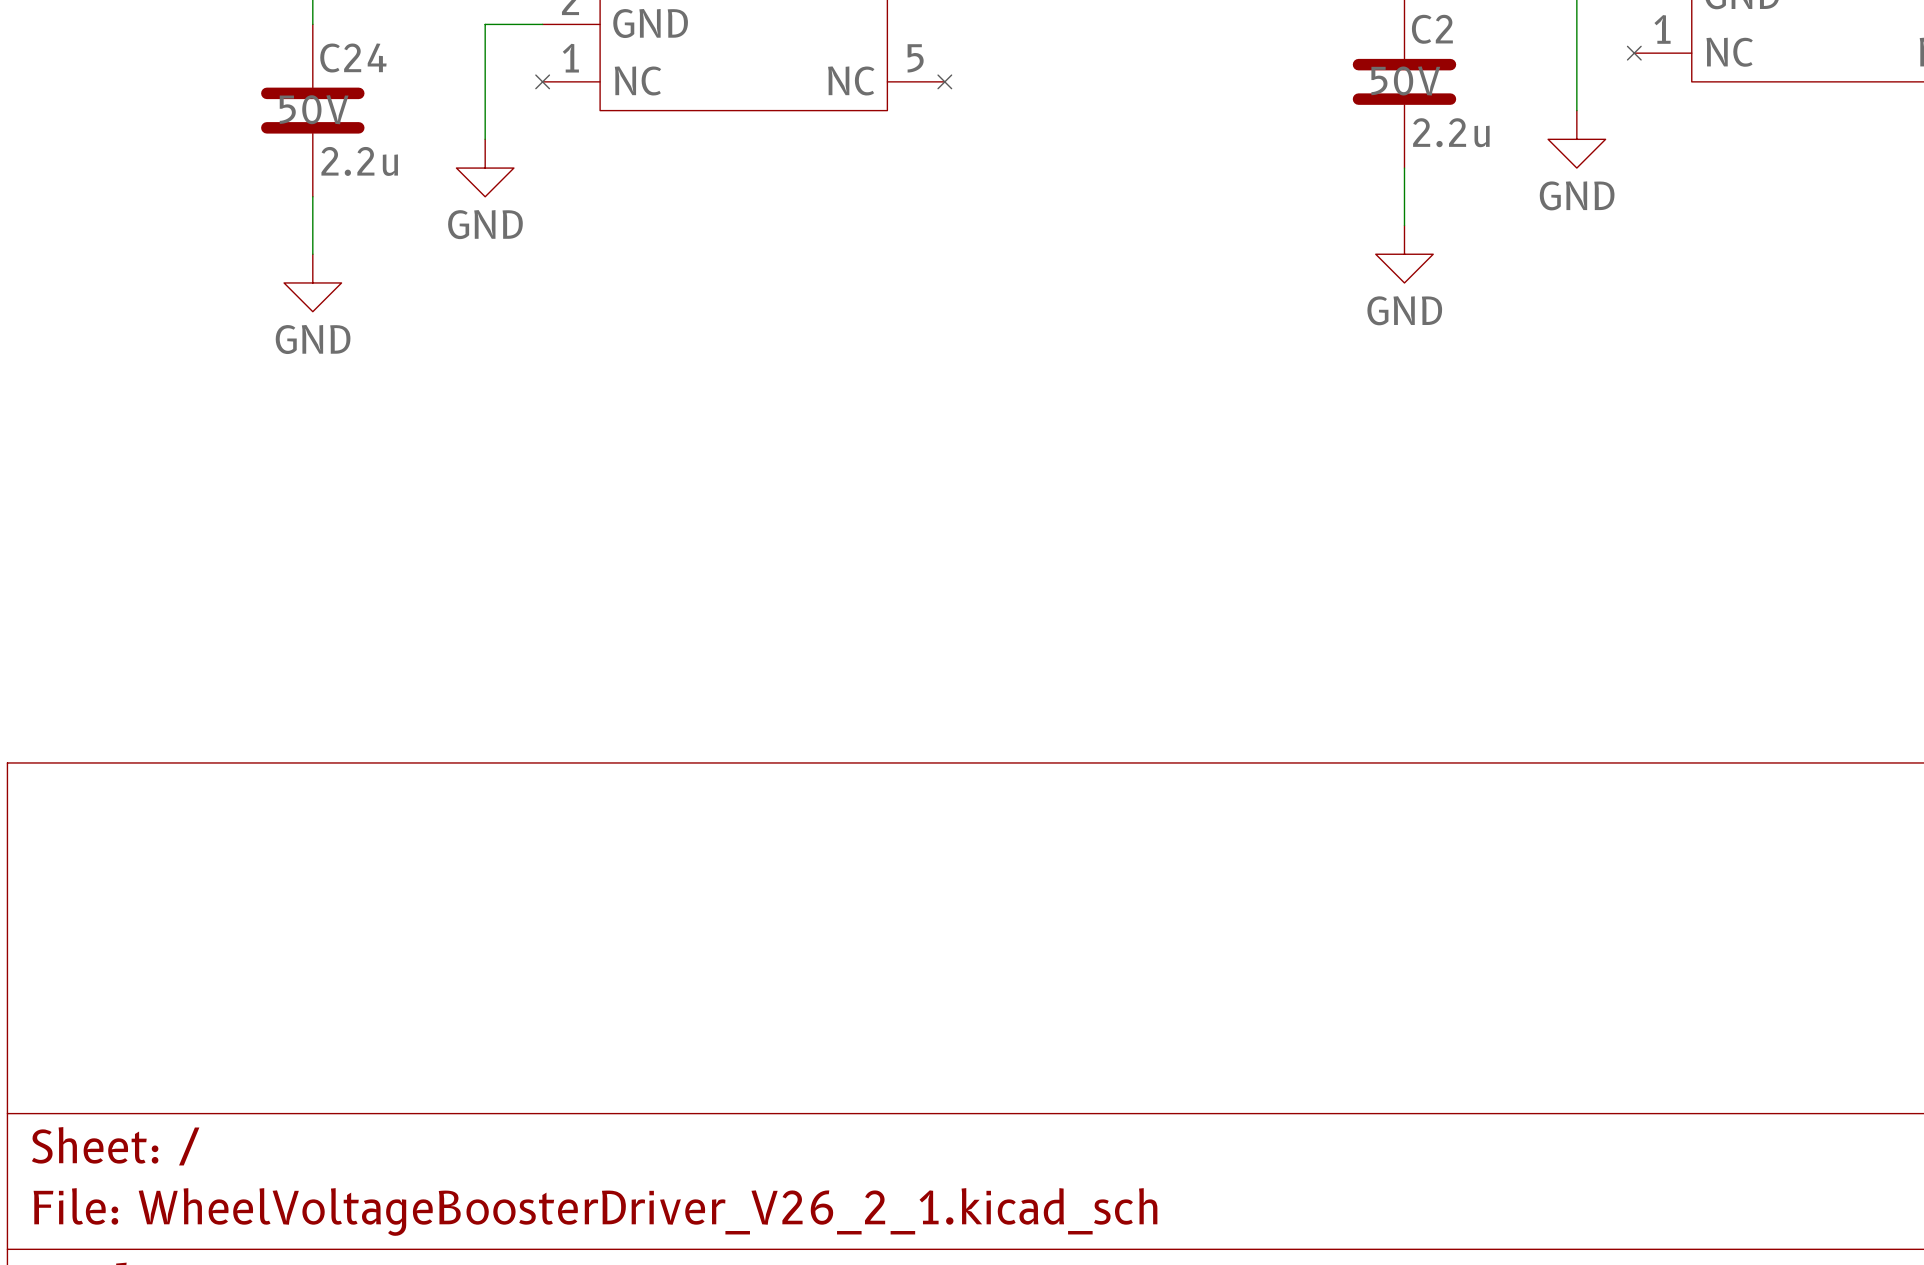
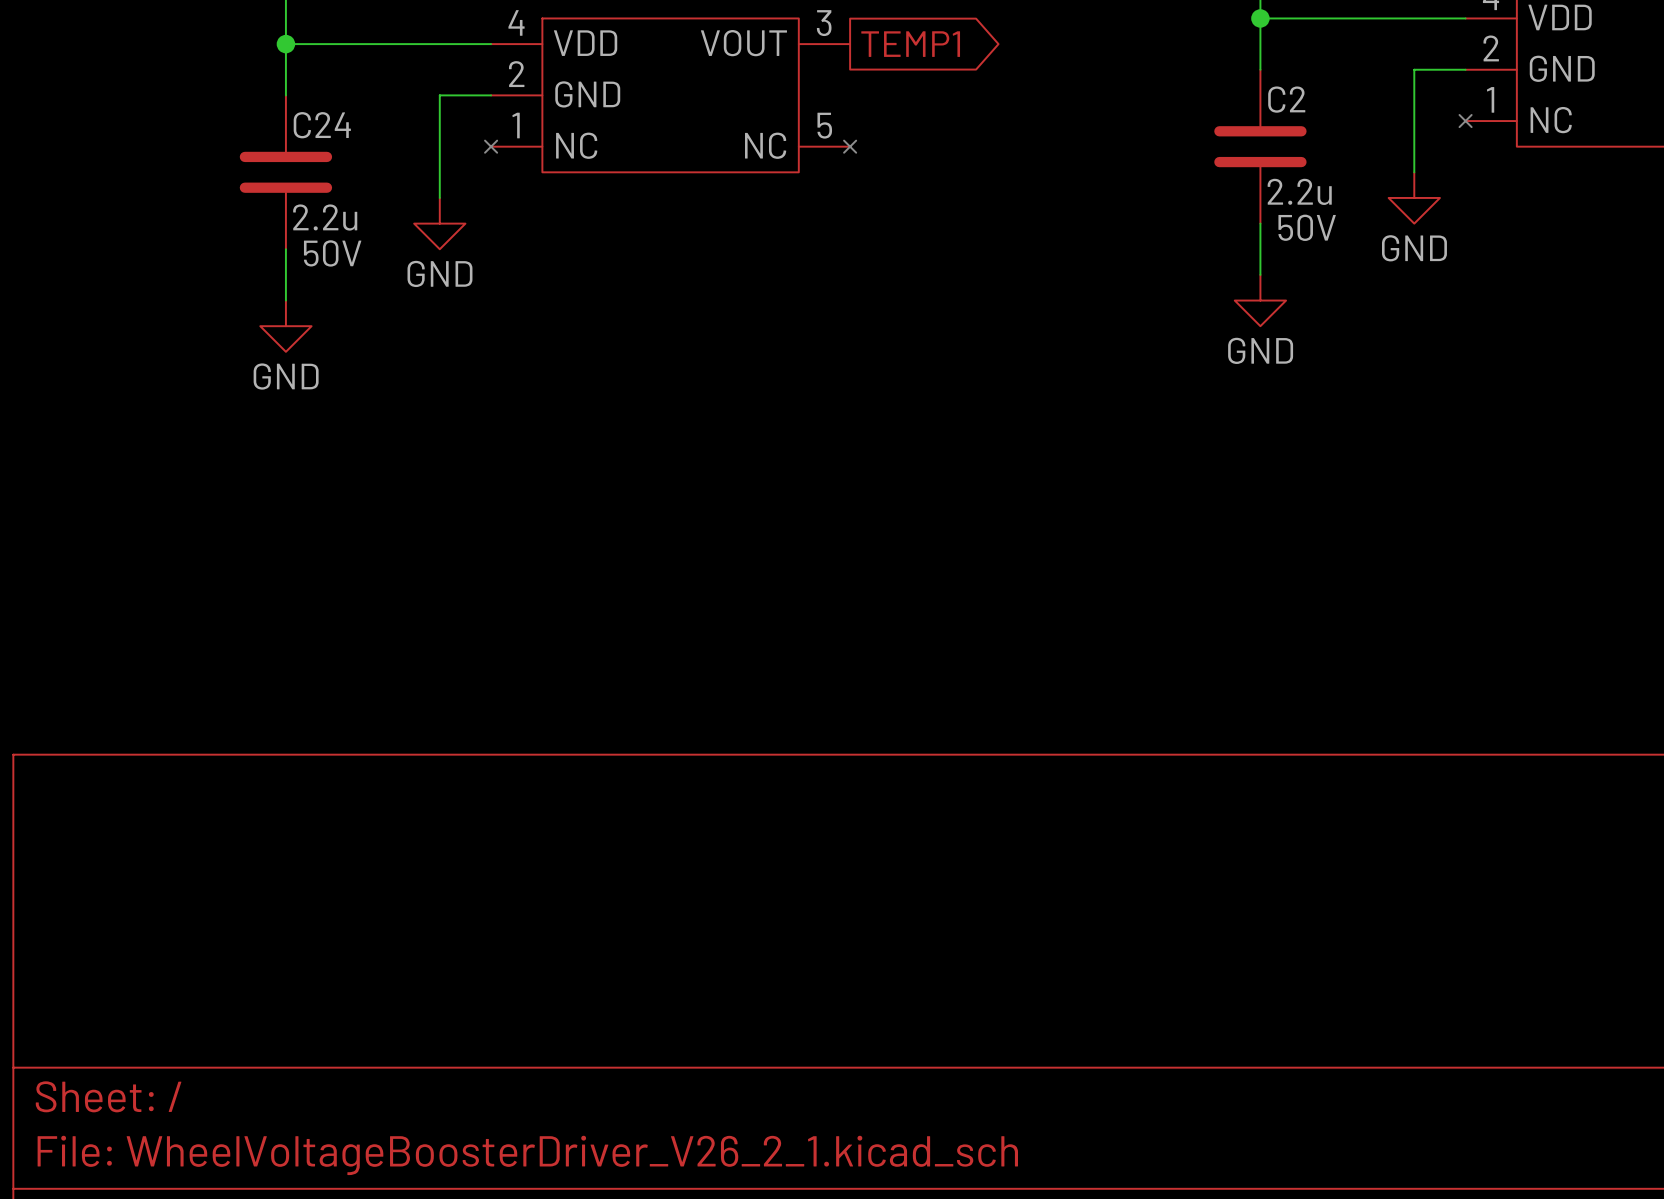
C2 text position: 50V (1405, 80) -> 50V (1307, 227)
C24 text position: 50V (314, 109) -> 50V (332, 253)

